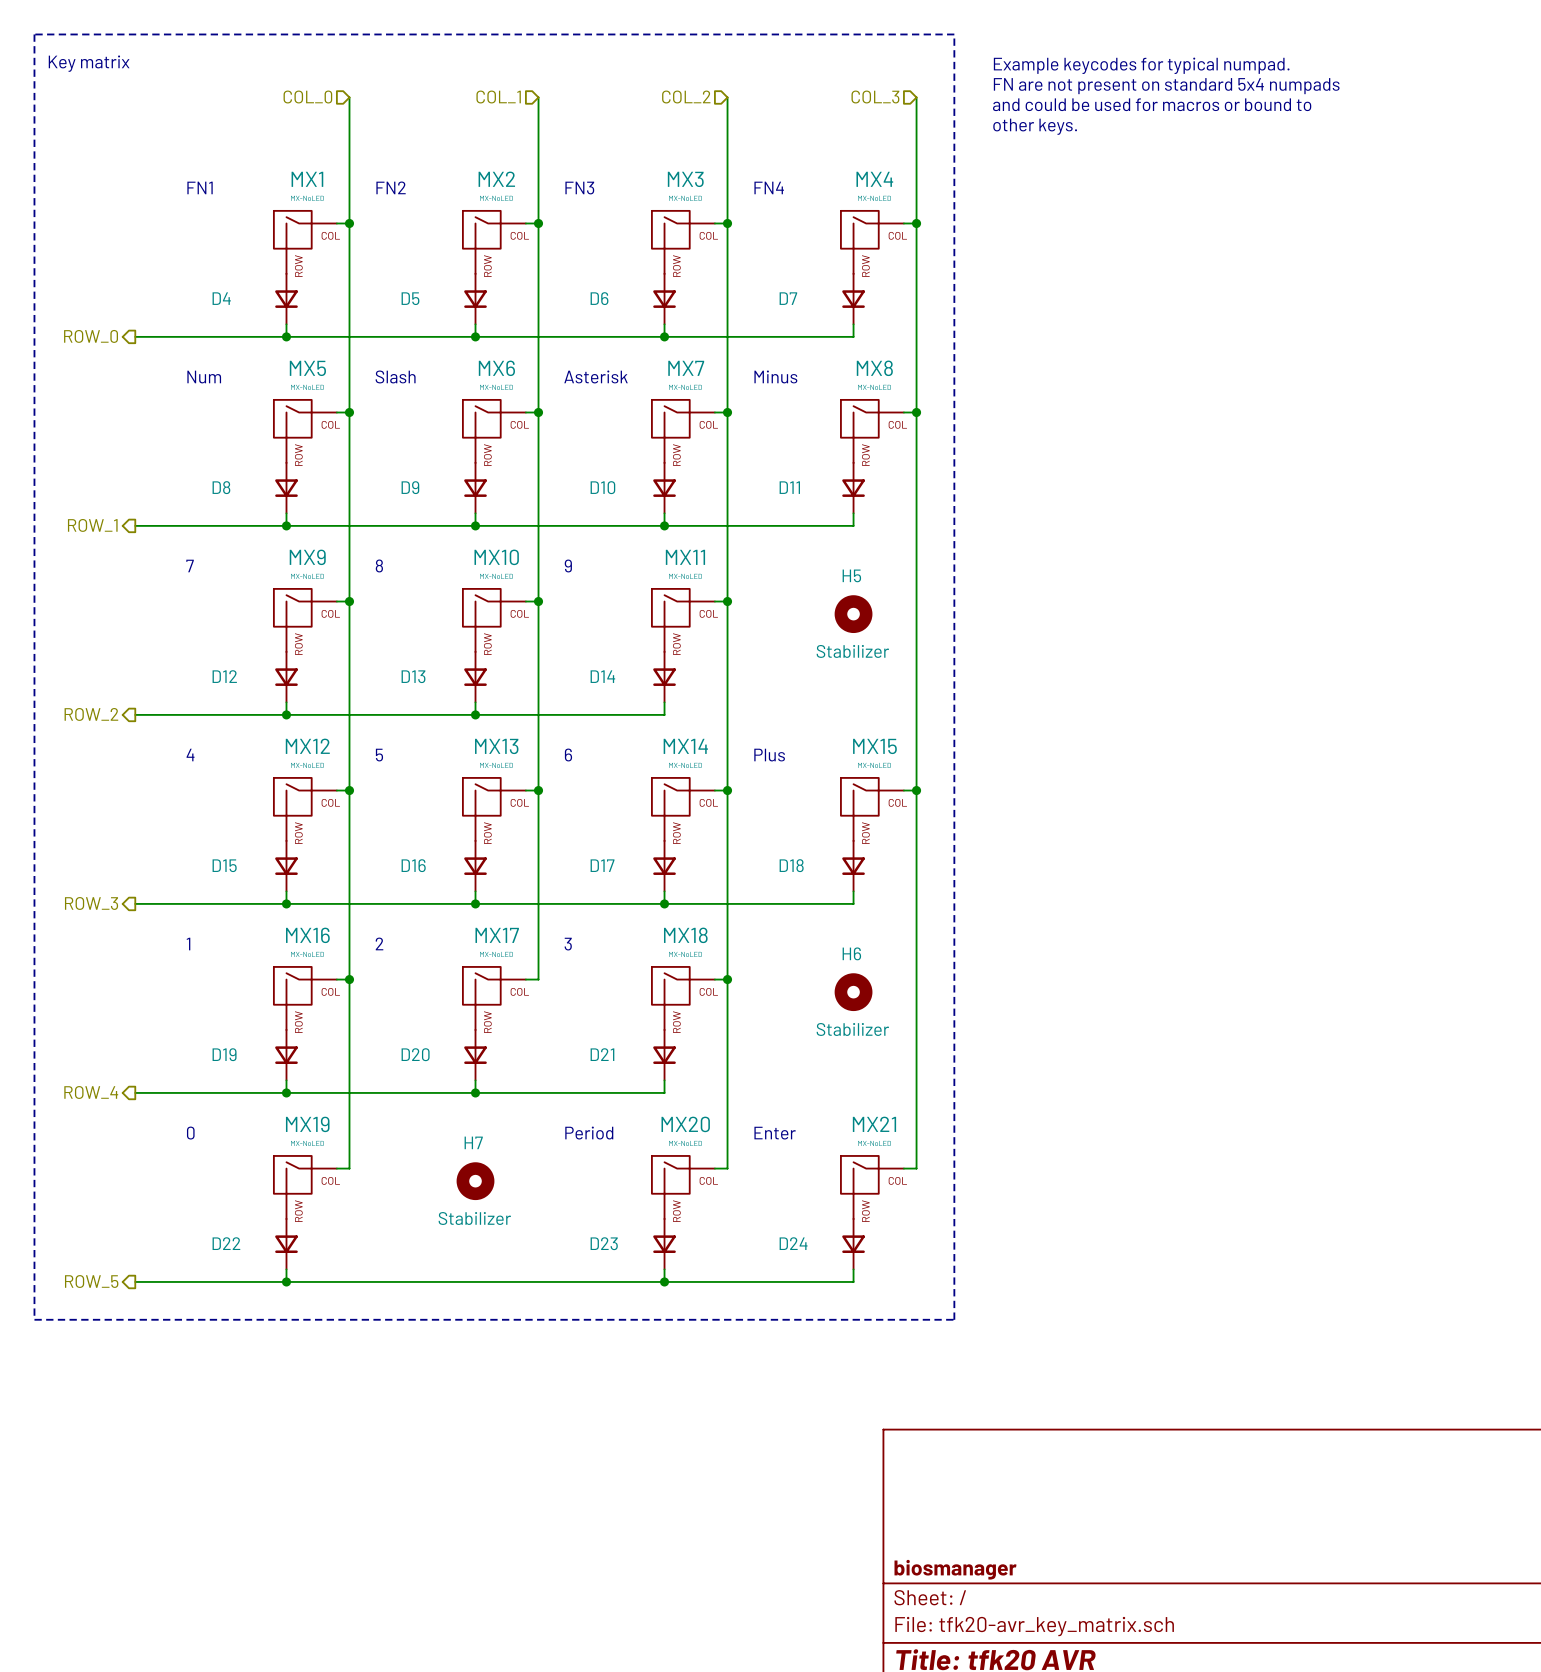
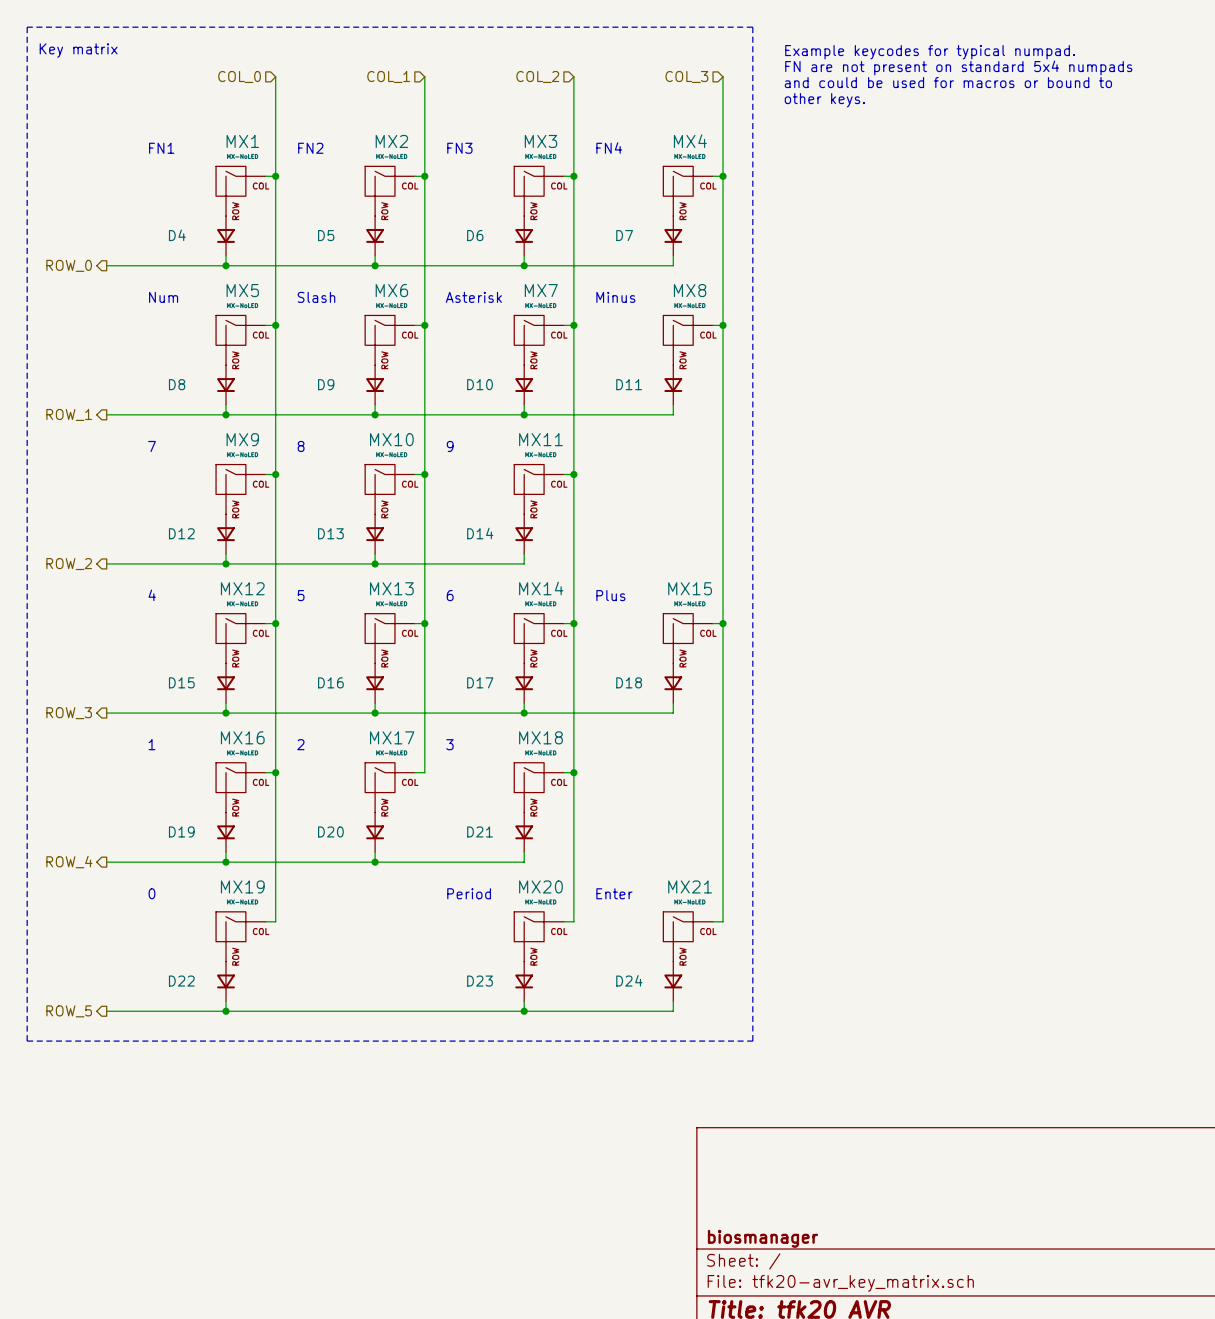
H5: Stabilizer (853, 614) -> none
H6: Stabilizer (853, 992) -> none
H7: Stabilizer (475, 1181) -> none

